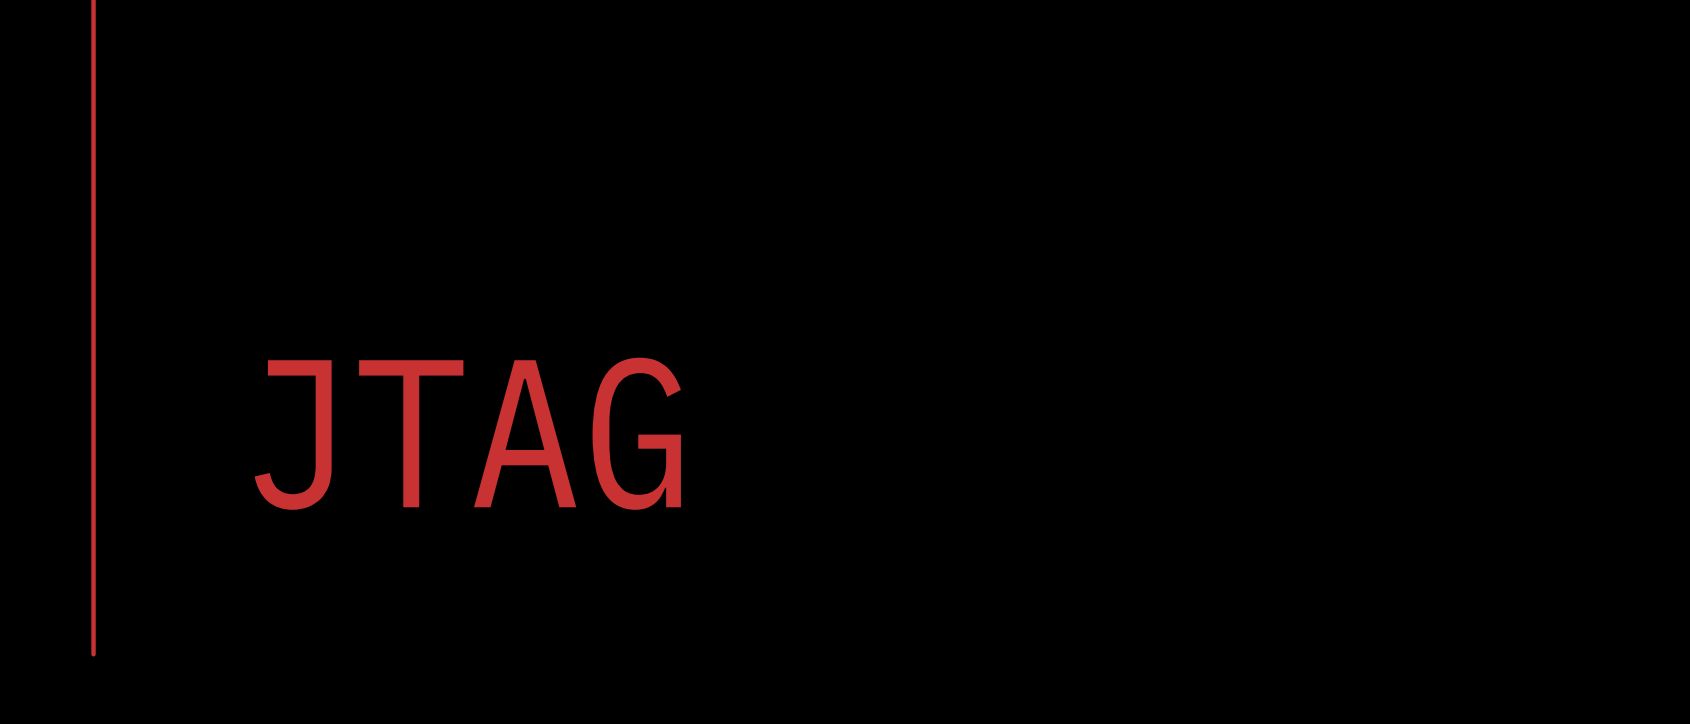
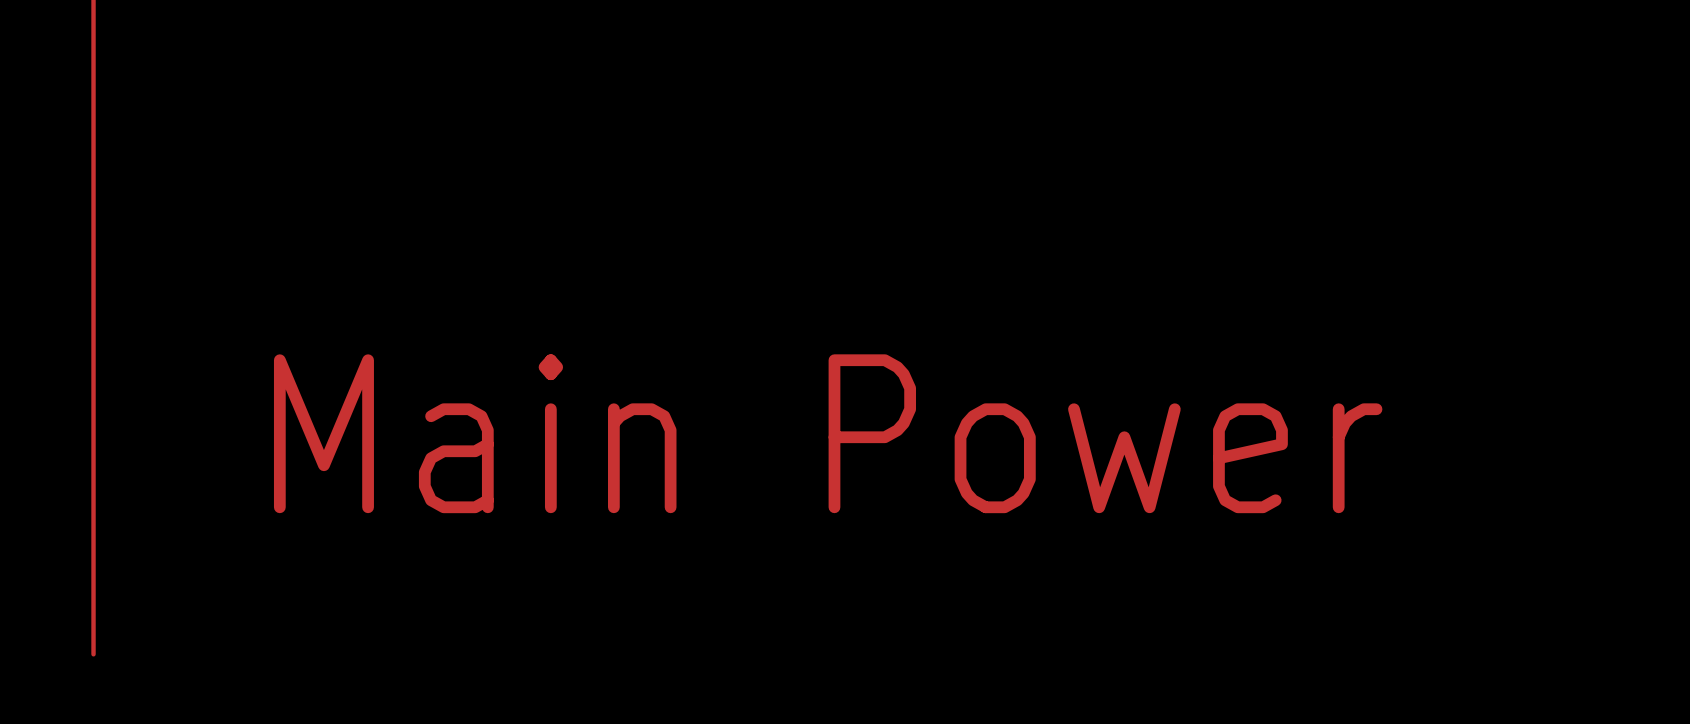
text: JTAG (467, 433) -> Main Power (828, 433)

